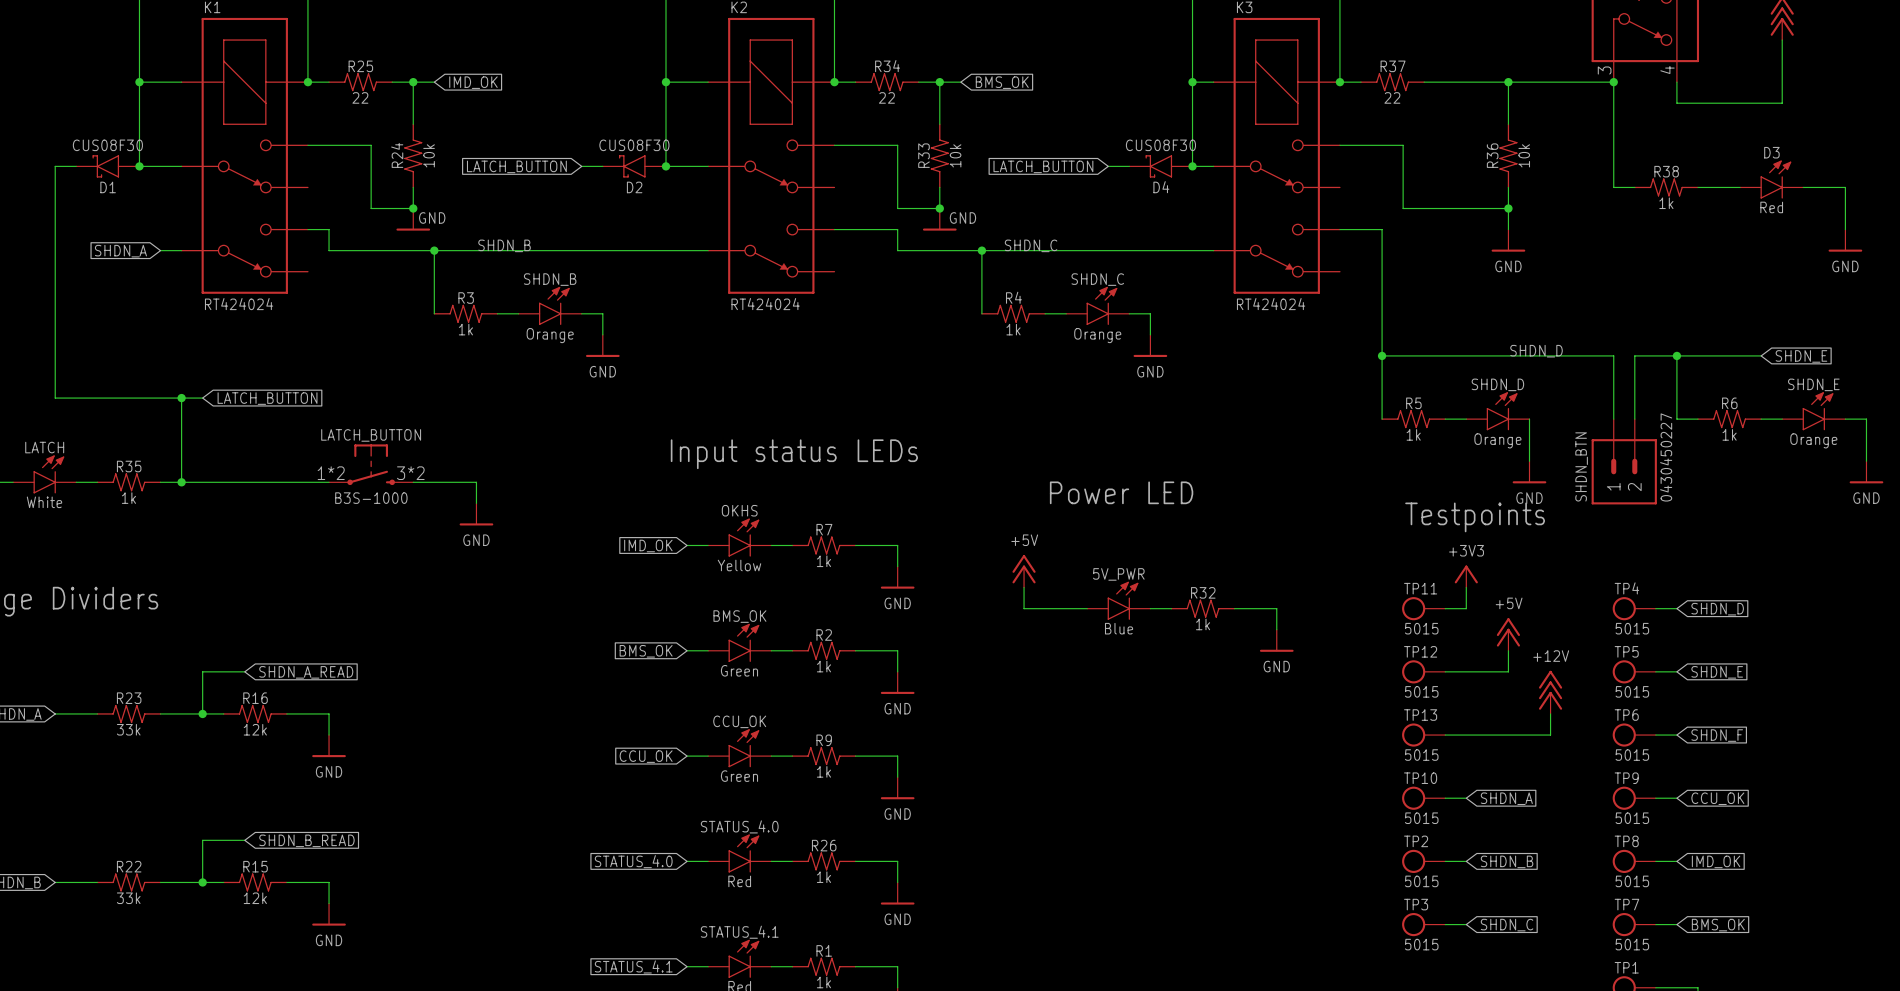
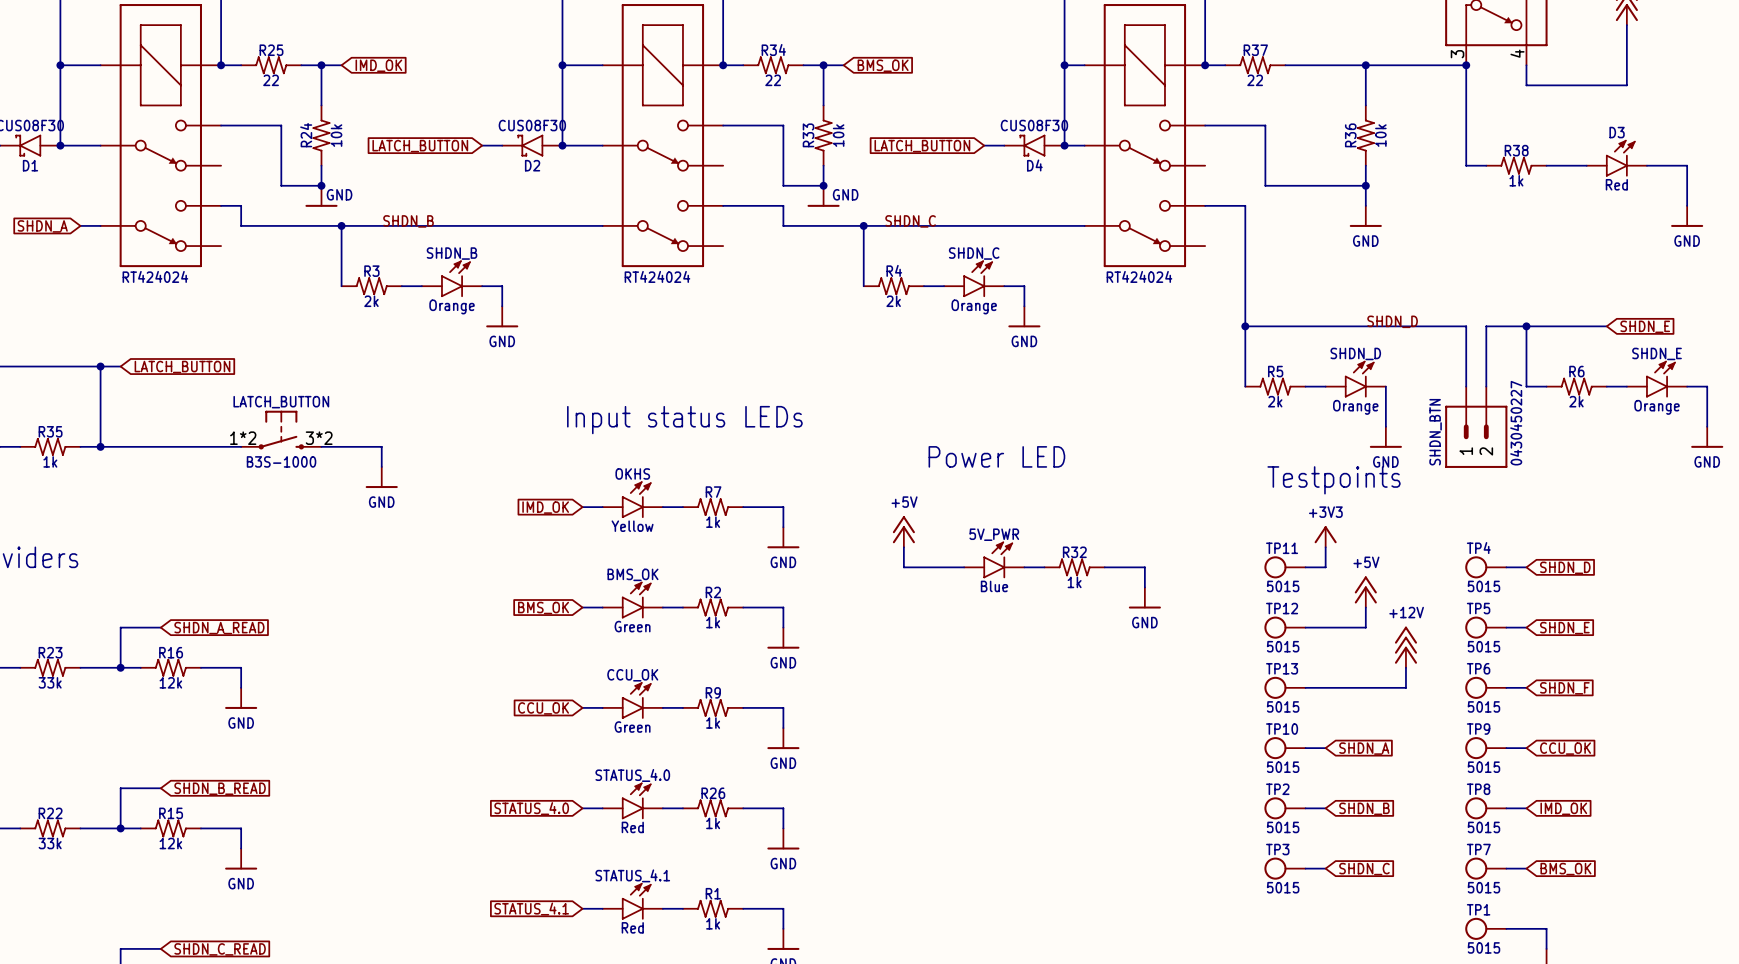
R3 text: 1k (465, 329) -> 2k (371, 301)
R4 text: 1k (1013, 329) -> 2k (893, 301)
R5 text: 1k (1413, 434) -> 2k (1275, 401)
R6 text: 1k (1729, 434) -> 2k (1576, 401)

